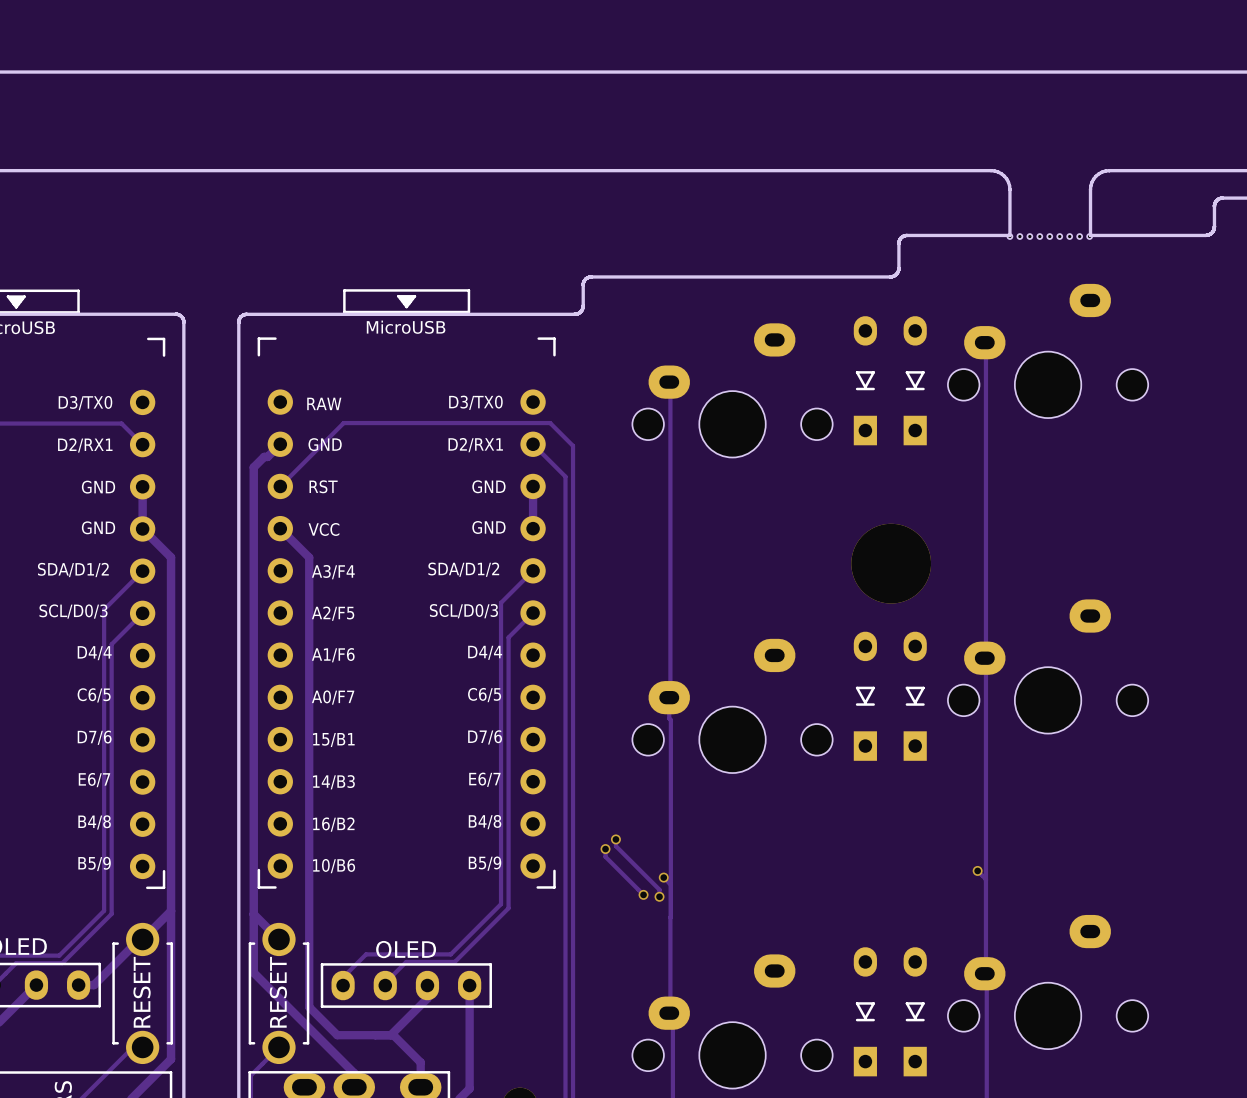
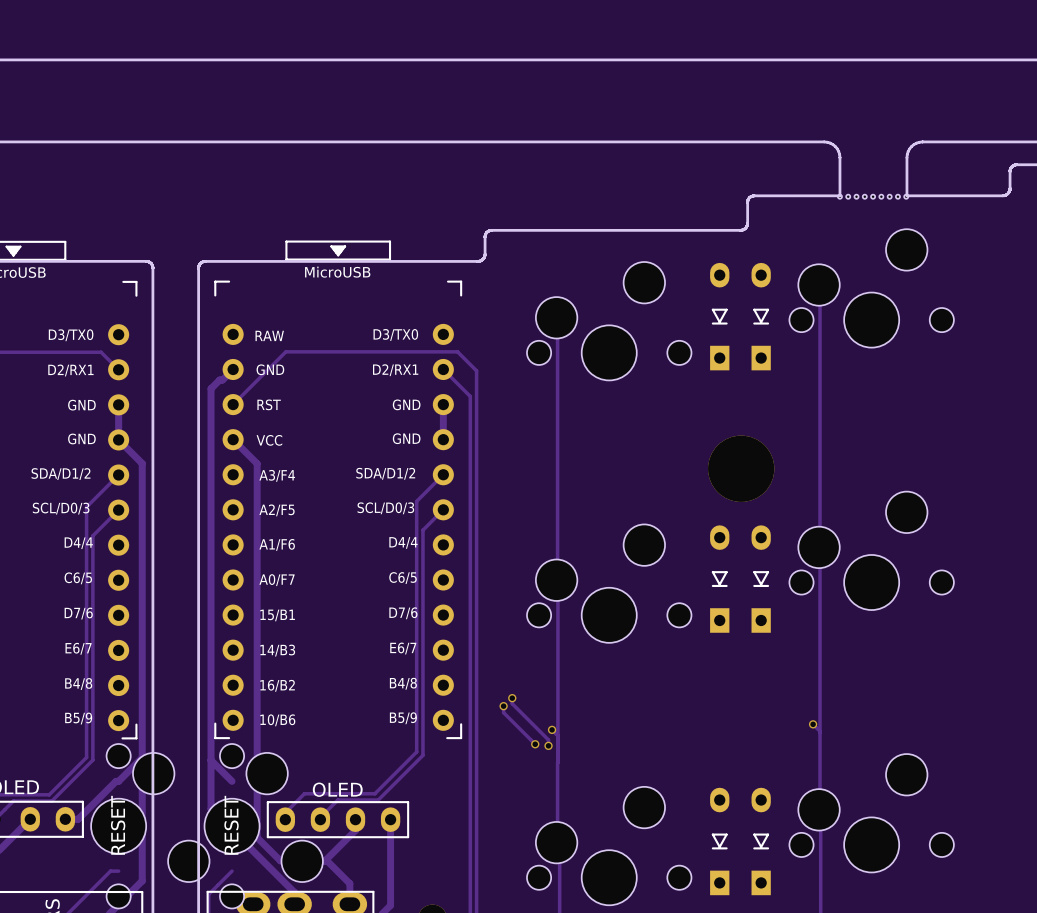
part footprint: [947, 283, 1149, 419] -> [789, 229, 954, 348]
part footprint: [632, 323, 833, 458] -> [526, 262, 692, 381]
part footprint: [947, 599, 1149, 734] -> [789, 491, 954, 611]
part footprint: [632, 638, 833, 774] -> [526, 524, 692, 643]
part footprint: [947, 914, 1149, 1050] -> [789, 754, 954, 873]
part footprint: [632, 954, 833, 1089] -> [526, 786, 692, 906]
part: (142, 993) -> none
part: none -> (150, 826)
part: (278, 993) -> none
part: none -> (263, 826)

